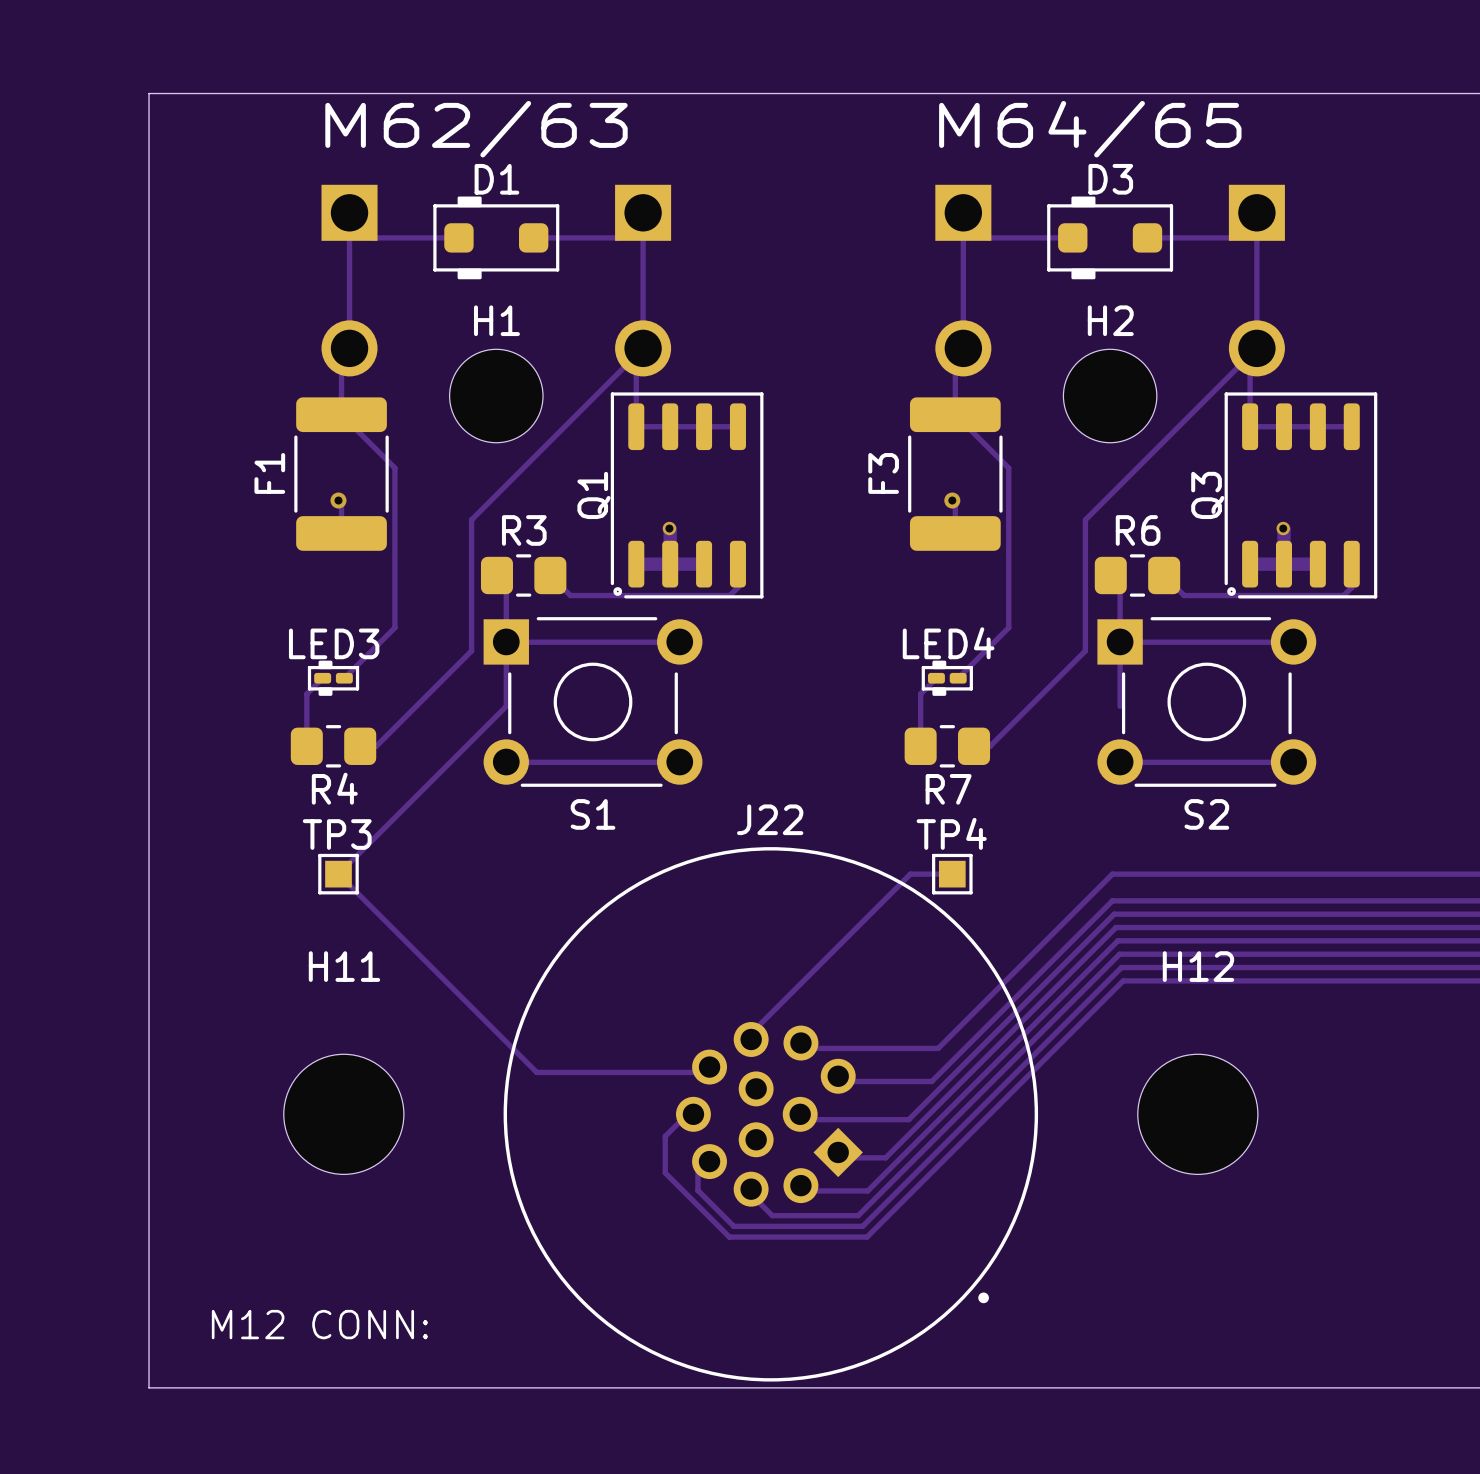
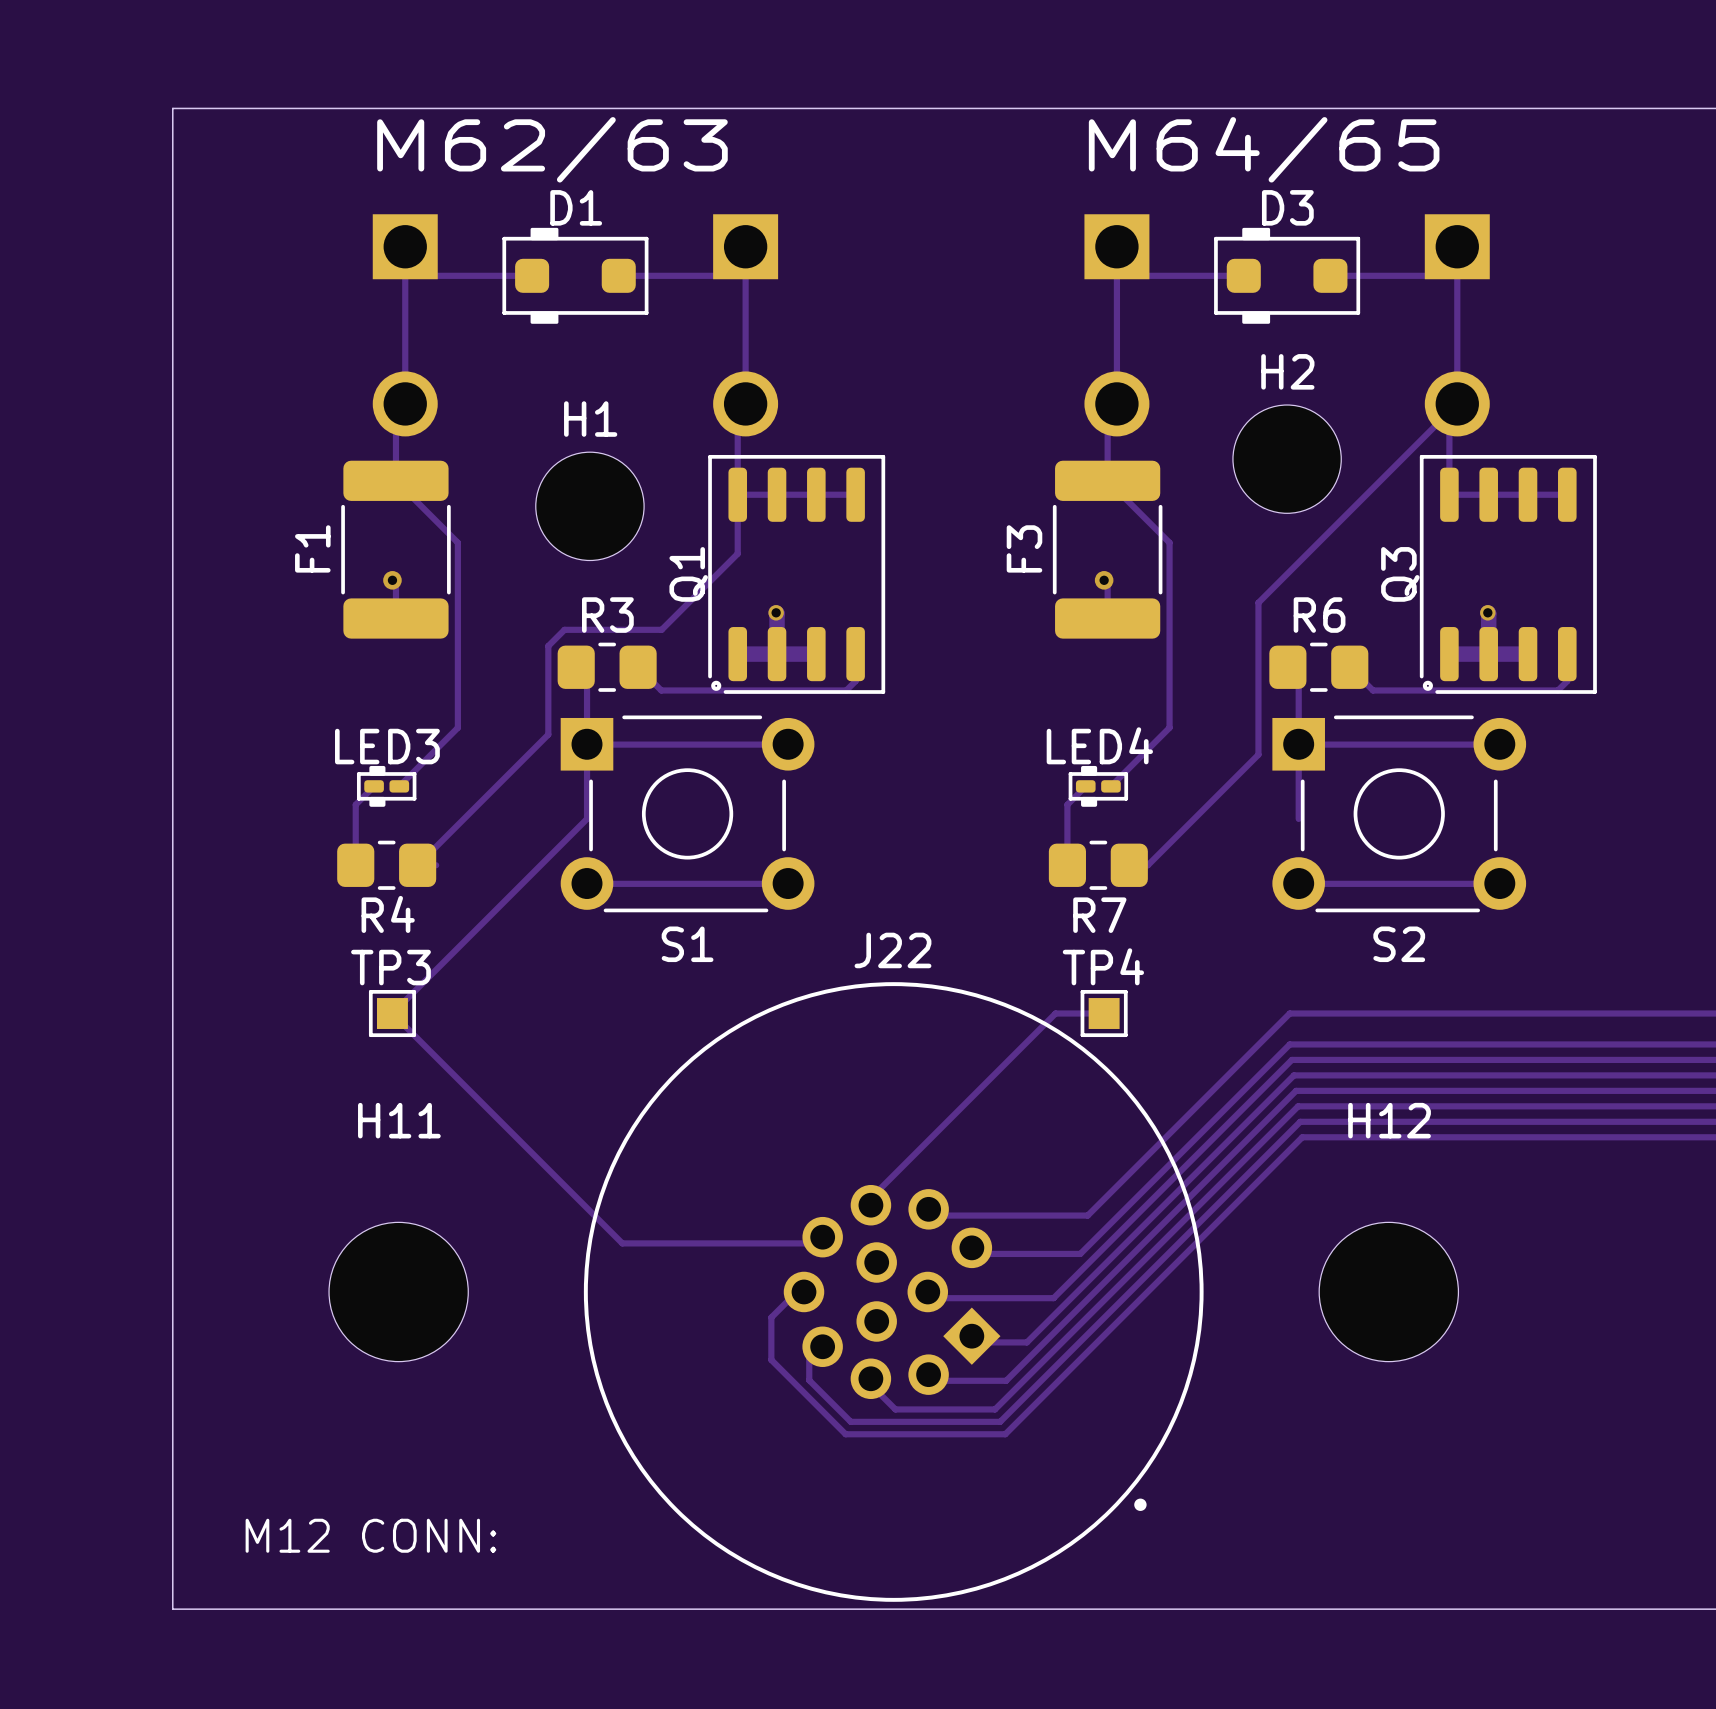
track: (636, 355) (471, 519) (471, 650) (376, 746) -> none
H1 position: (496, 396) -> (589, 506)
track: none -> (737, 494) (737, 553) (661, 629) (564, 629) (548, 646) (548, 734) (417, 865)

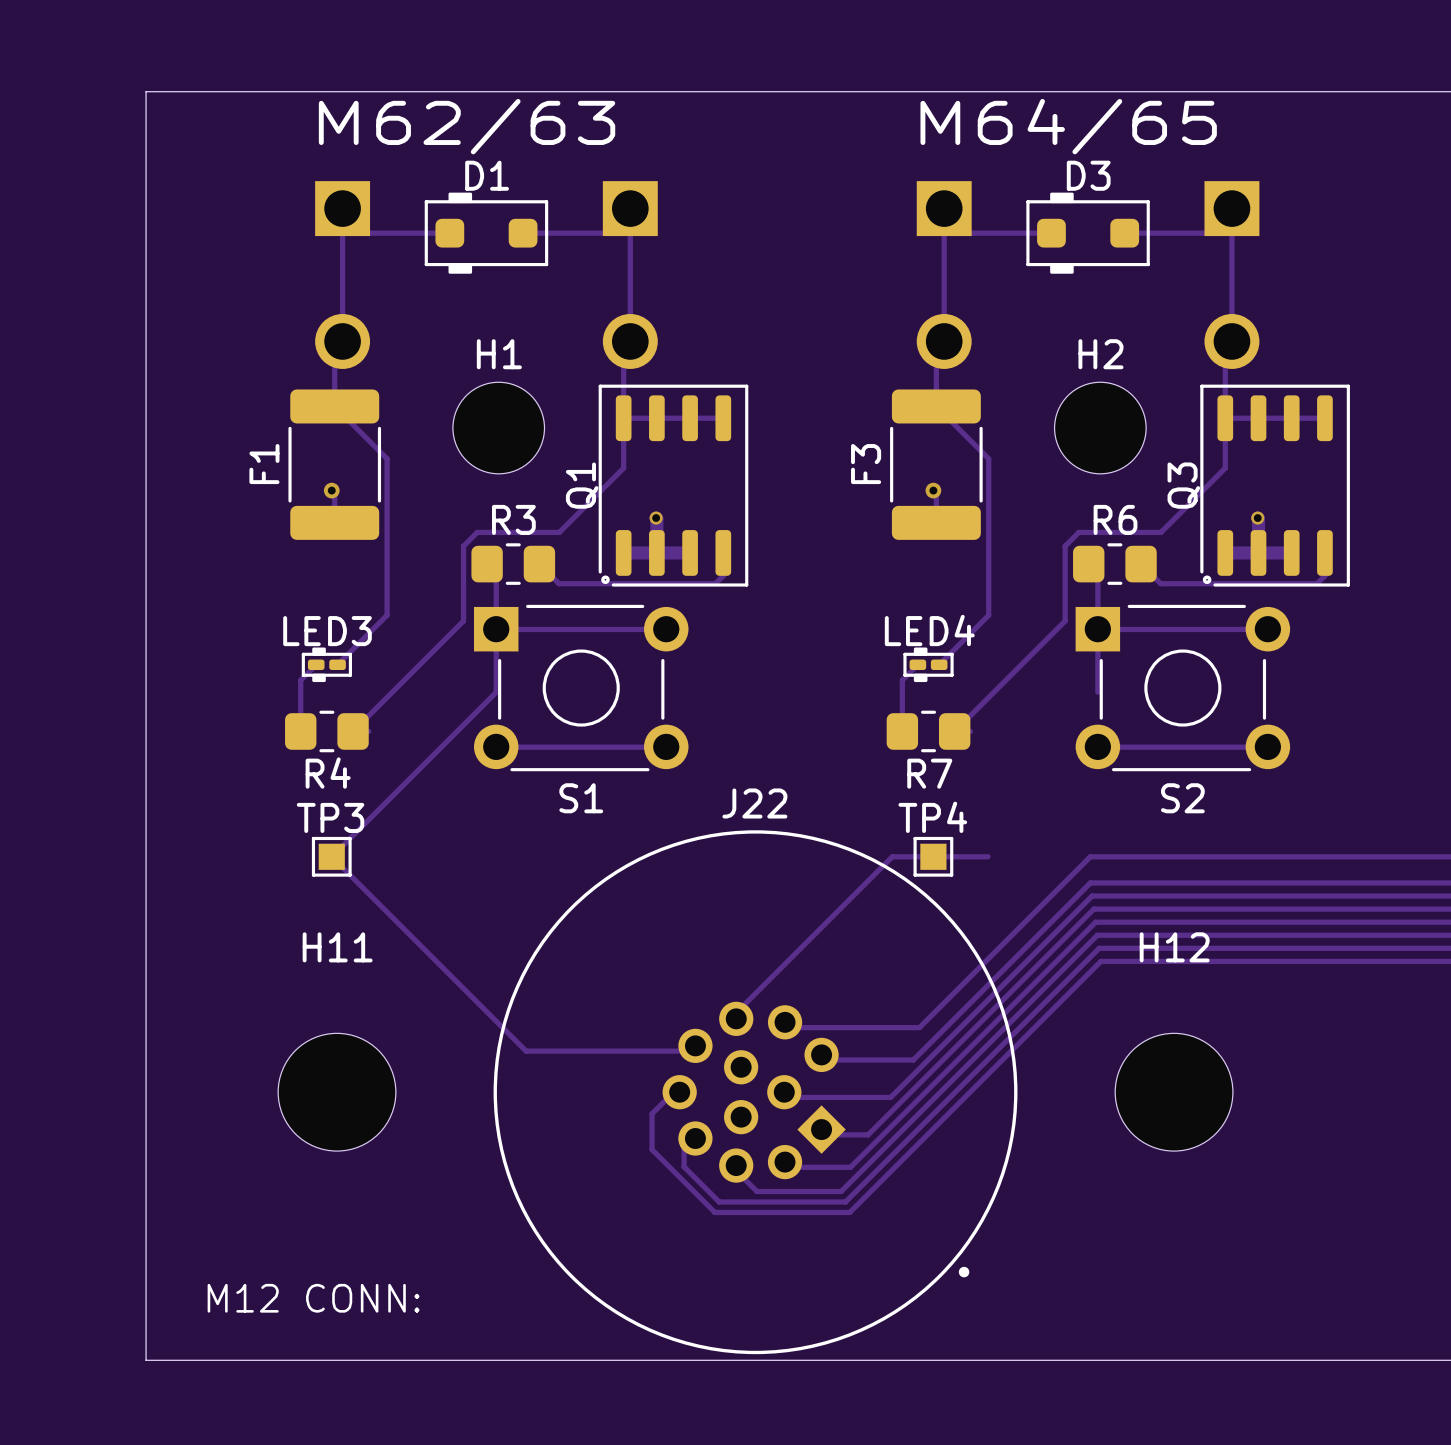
track: (1449, 411) (1258, 602) (1258, 754) (1147, 865) -> none
H2 position: (1287, 459) -> (1100, 428)
track: none -> (1225, 418) (1225, 468) (1160, 532) (1078, 532) (1065, 546) (1065, 620) (954, 731)
track: none -> (933, 856) (987, 856)

